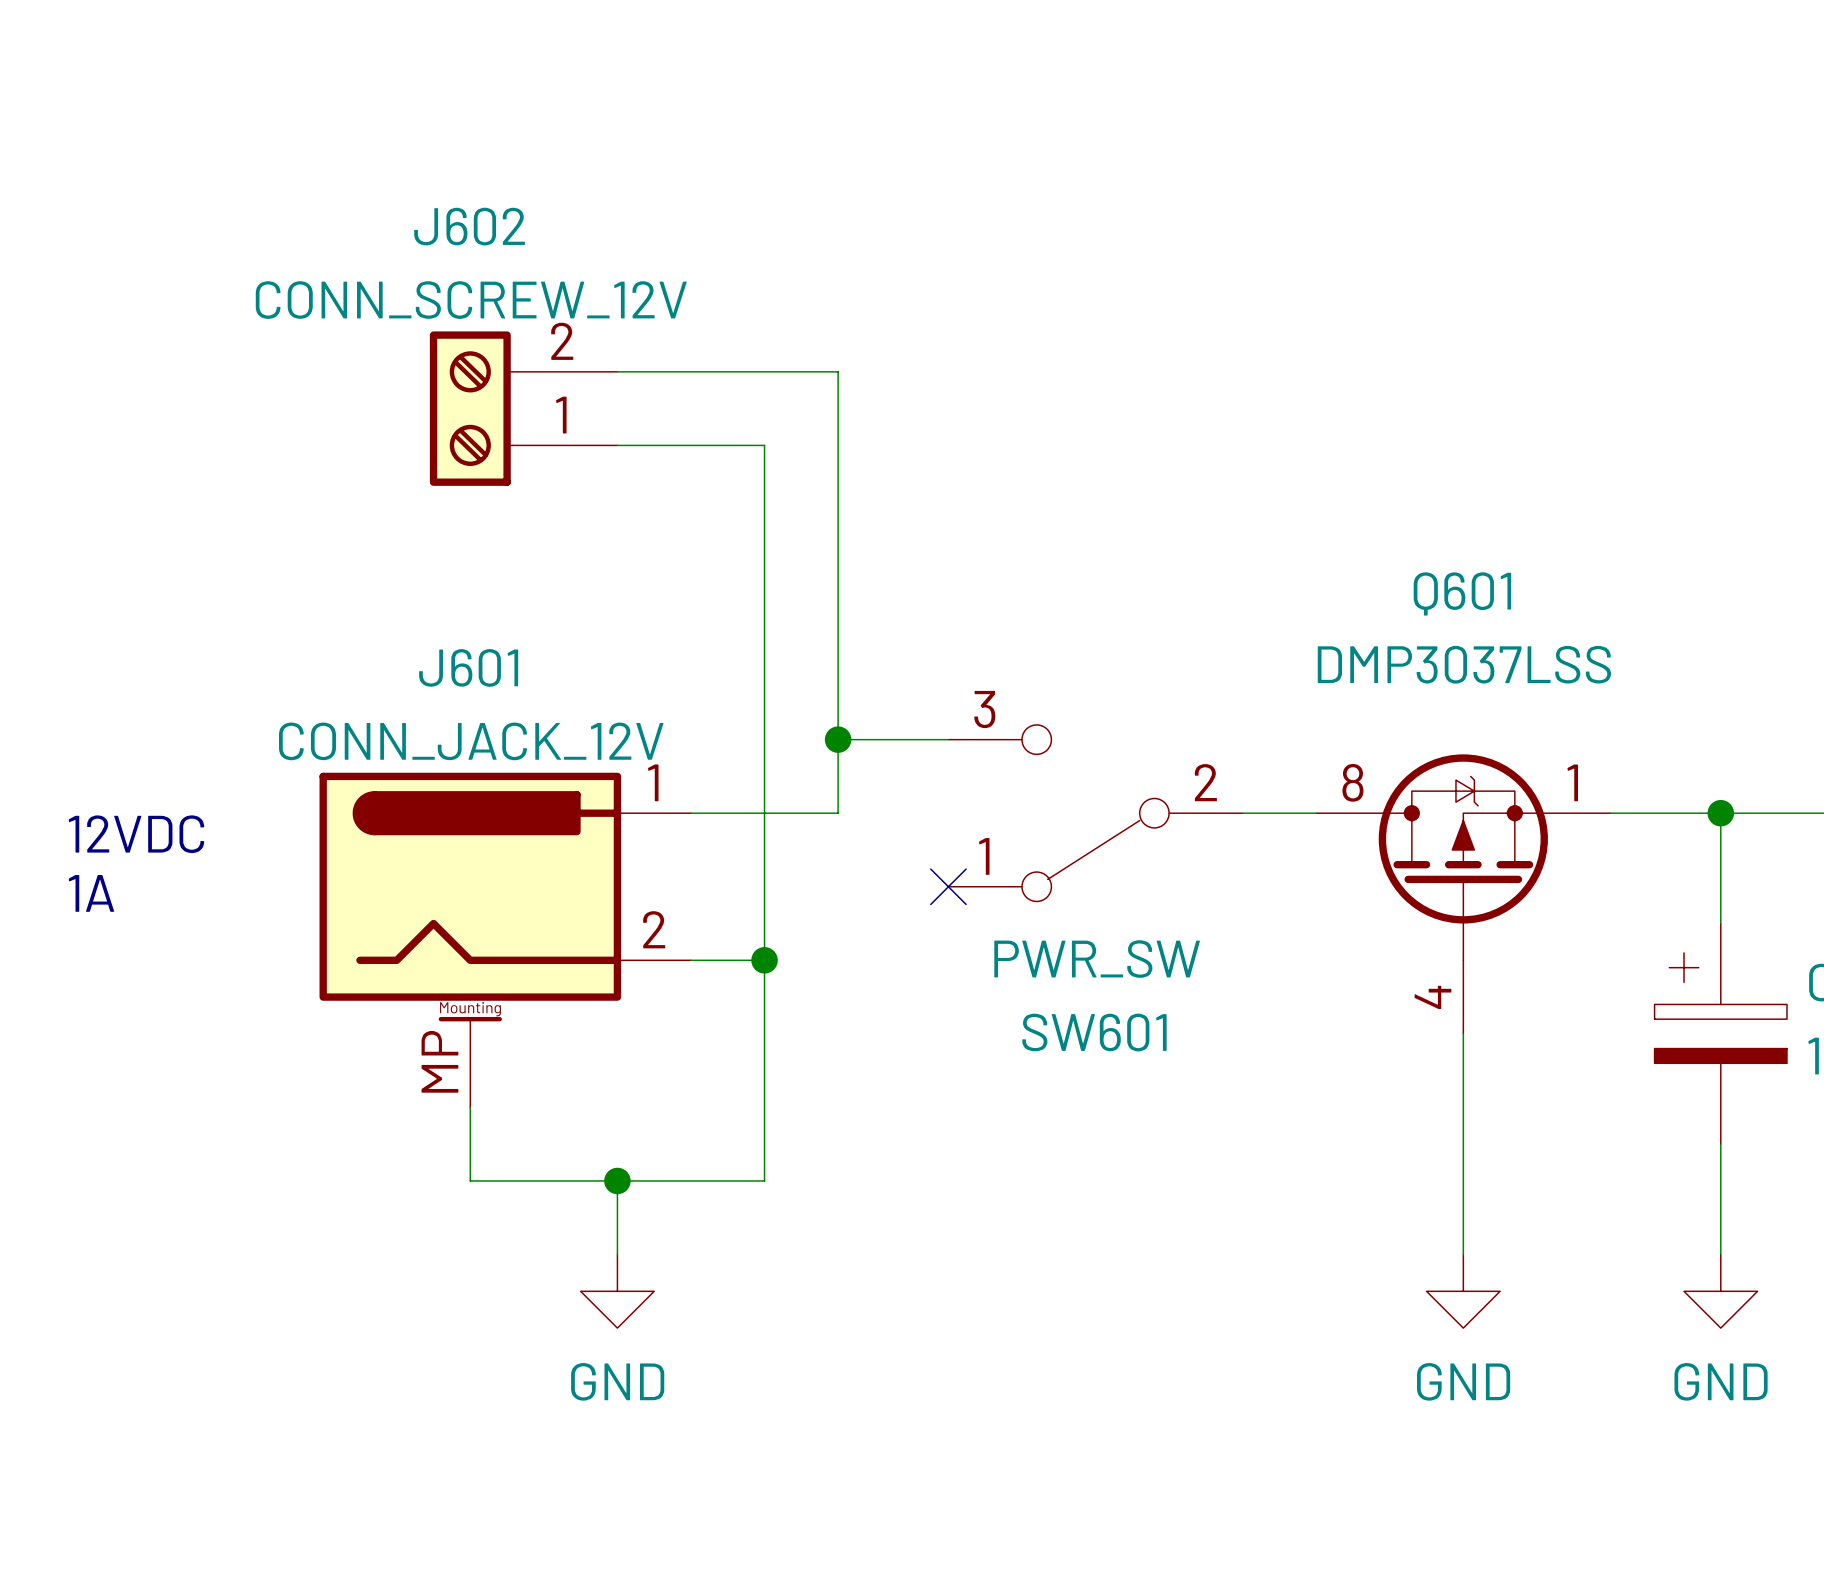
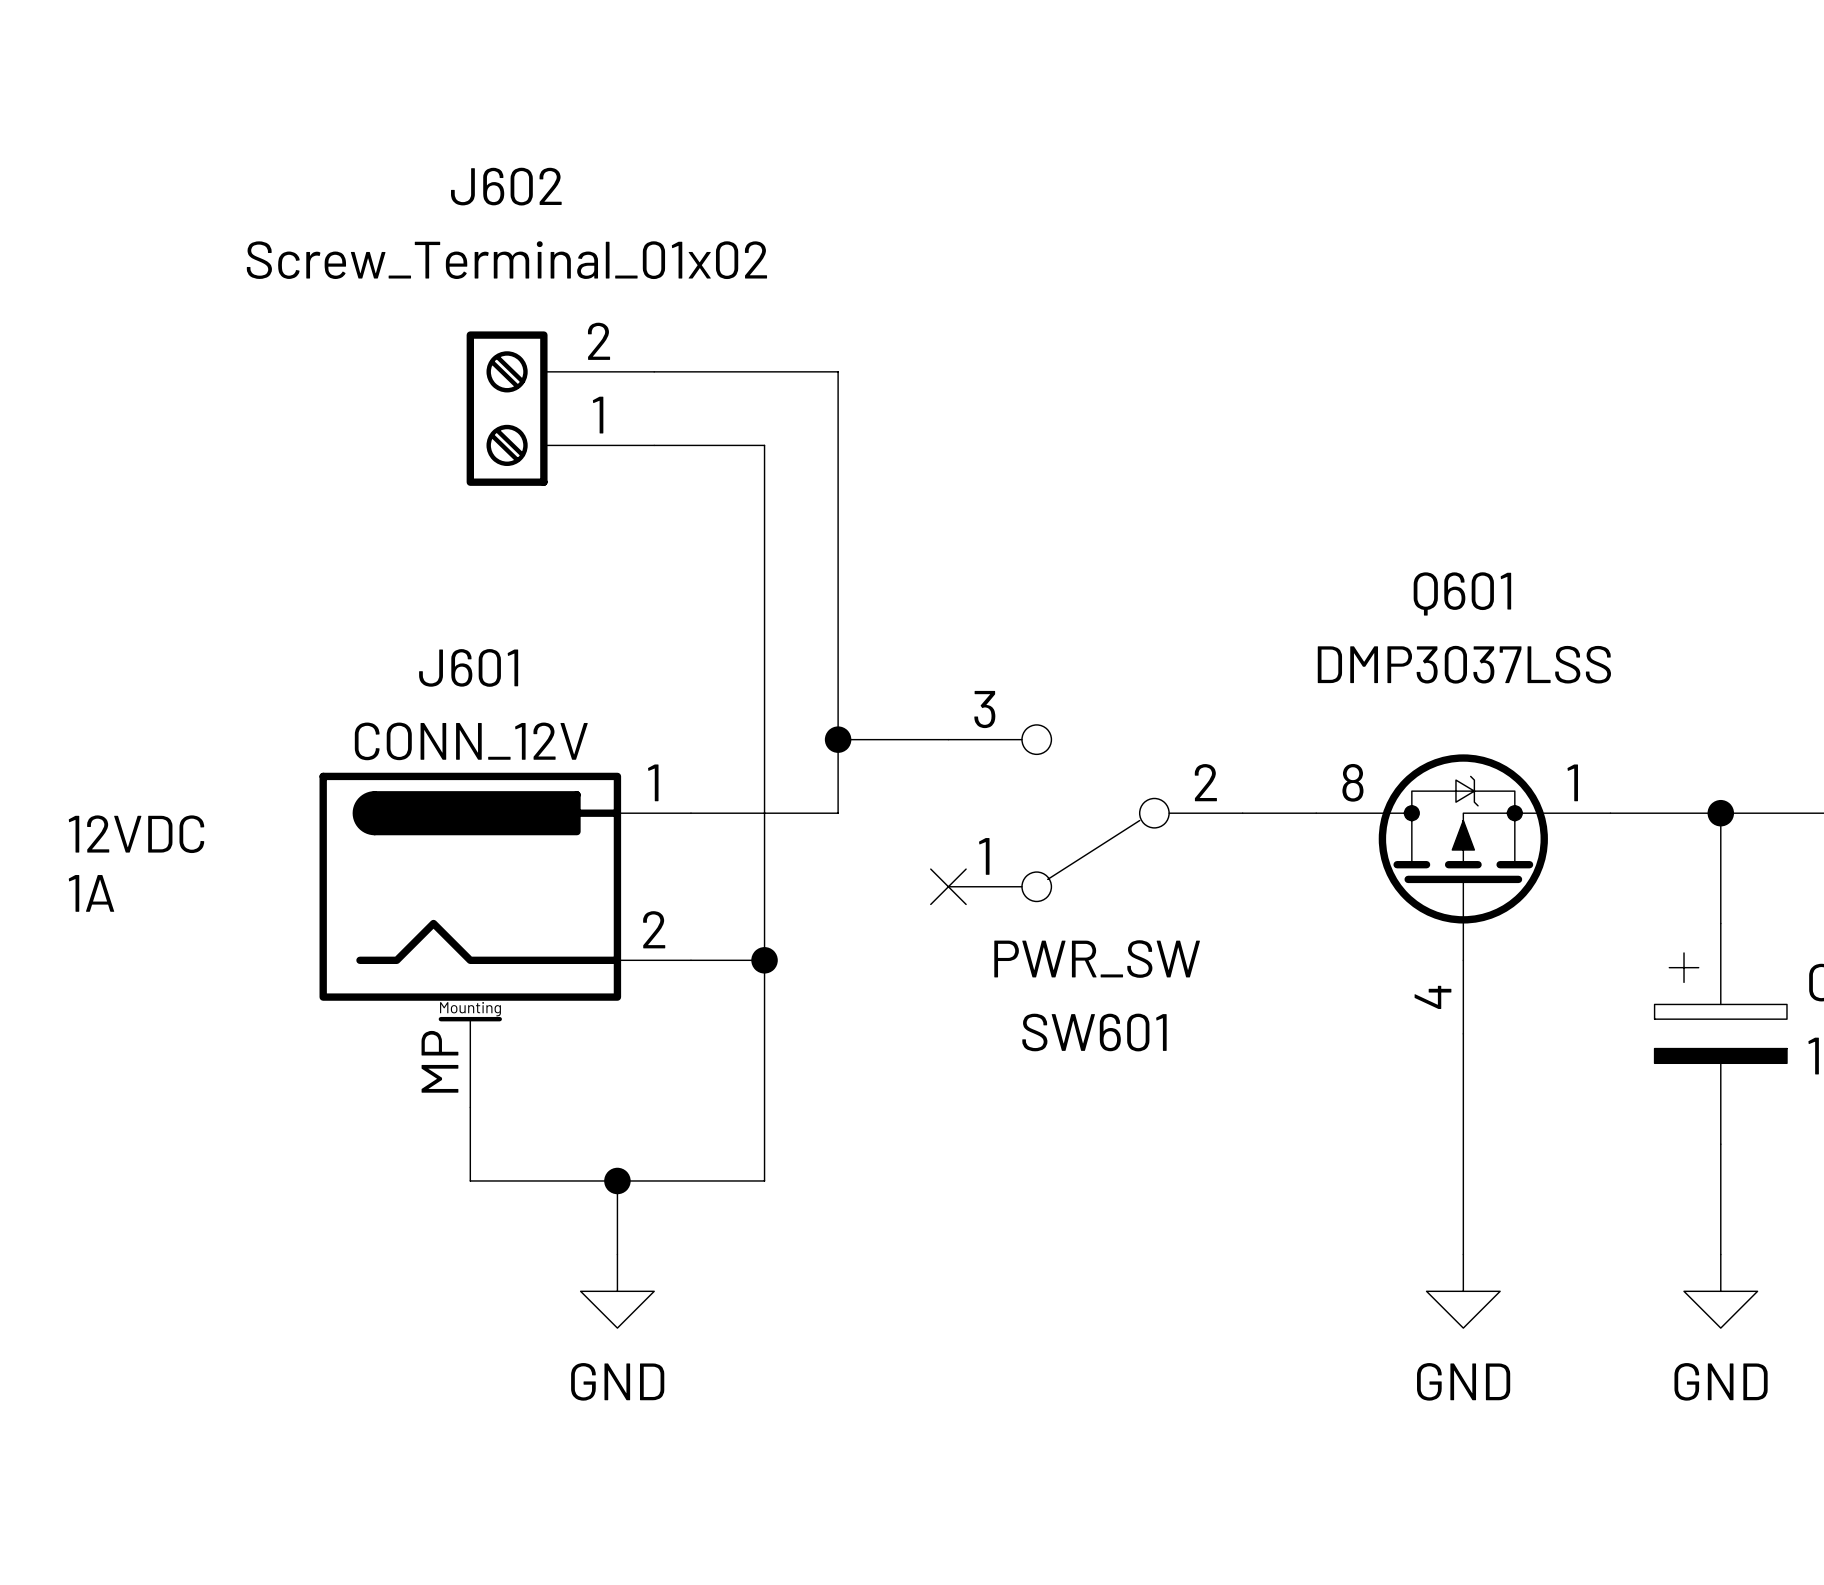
J602 name position: J602 (469, 226) -> J602 (506, 186)
J602 value: CONN_SCREW_12V (471, 300) -> Screw_Terminal_01x02 (506, 260)
J602 position: (523, 408) -> (560, 408)
J601 value: CONN_JACK_12V (471, 741) -> CONN_12V (471, 741)

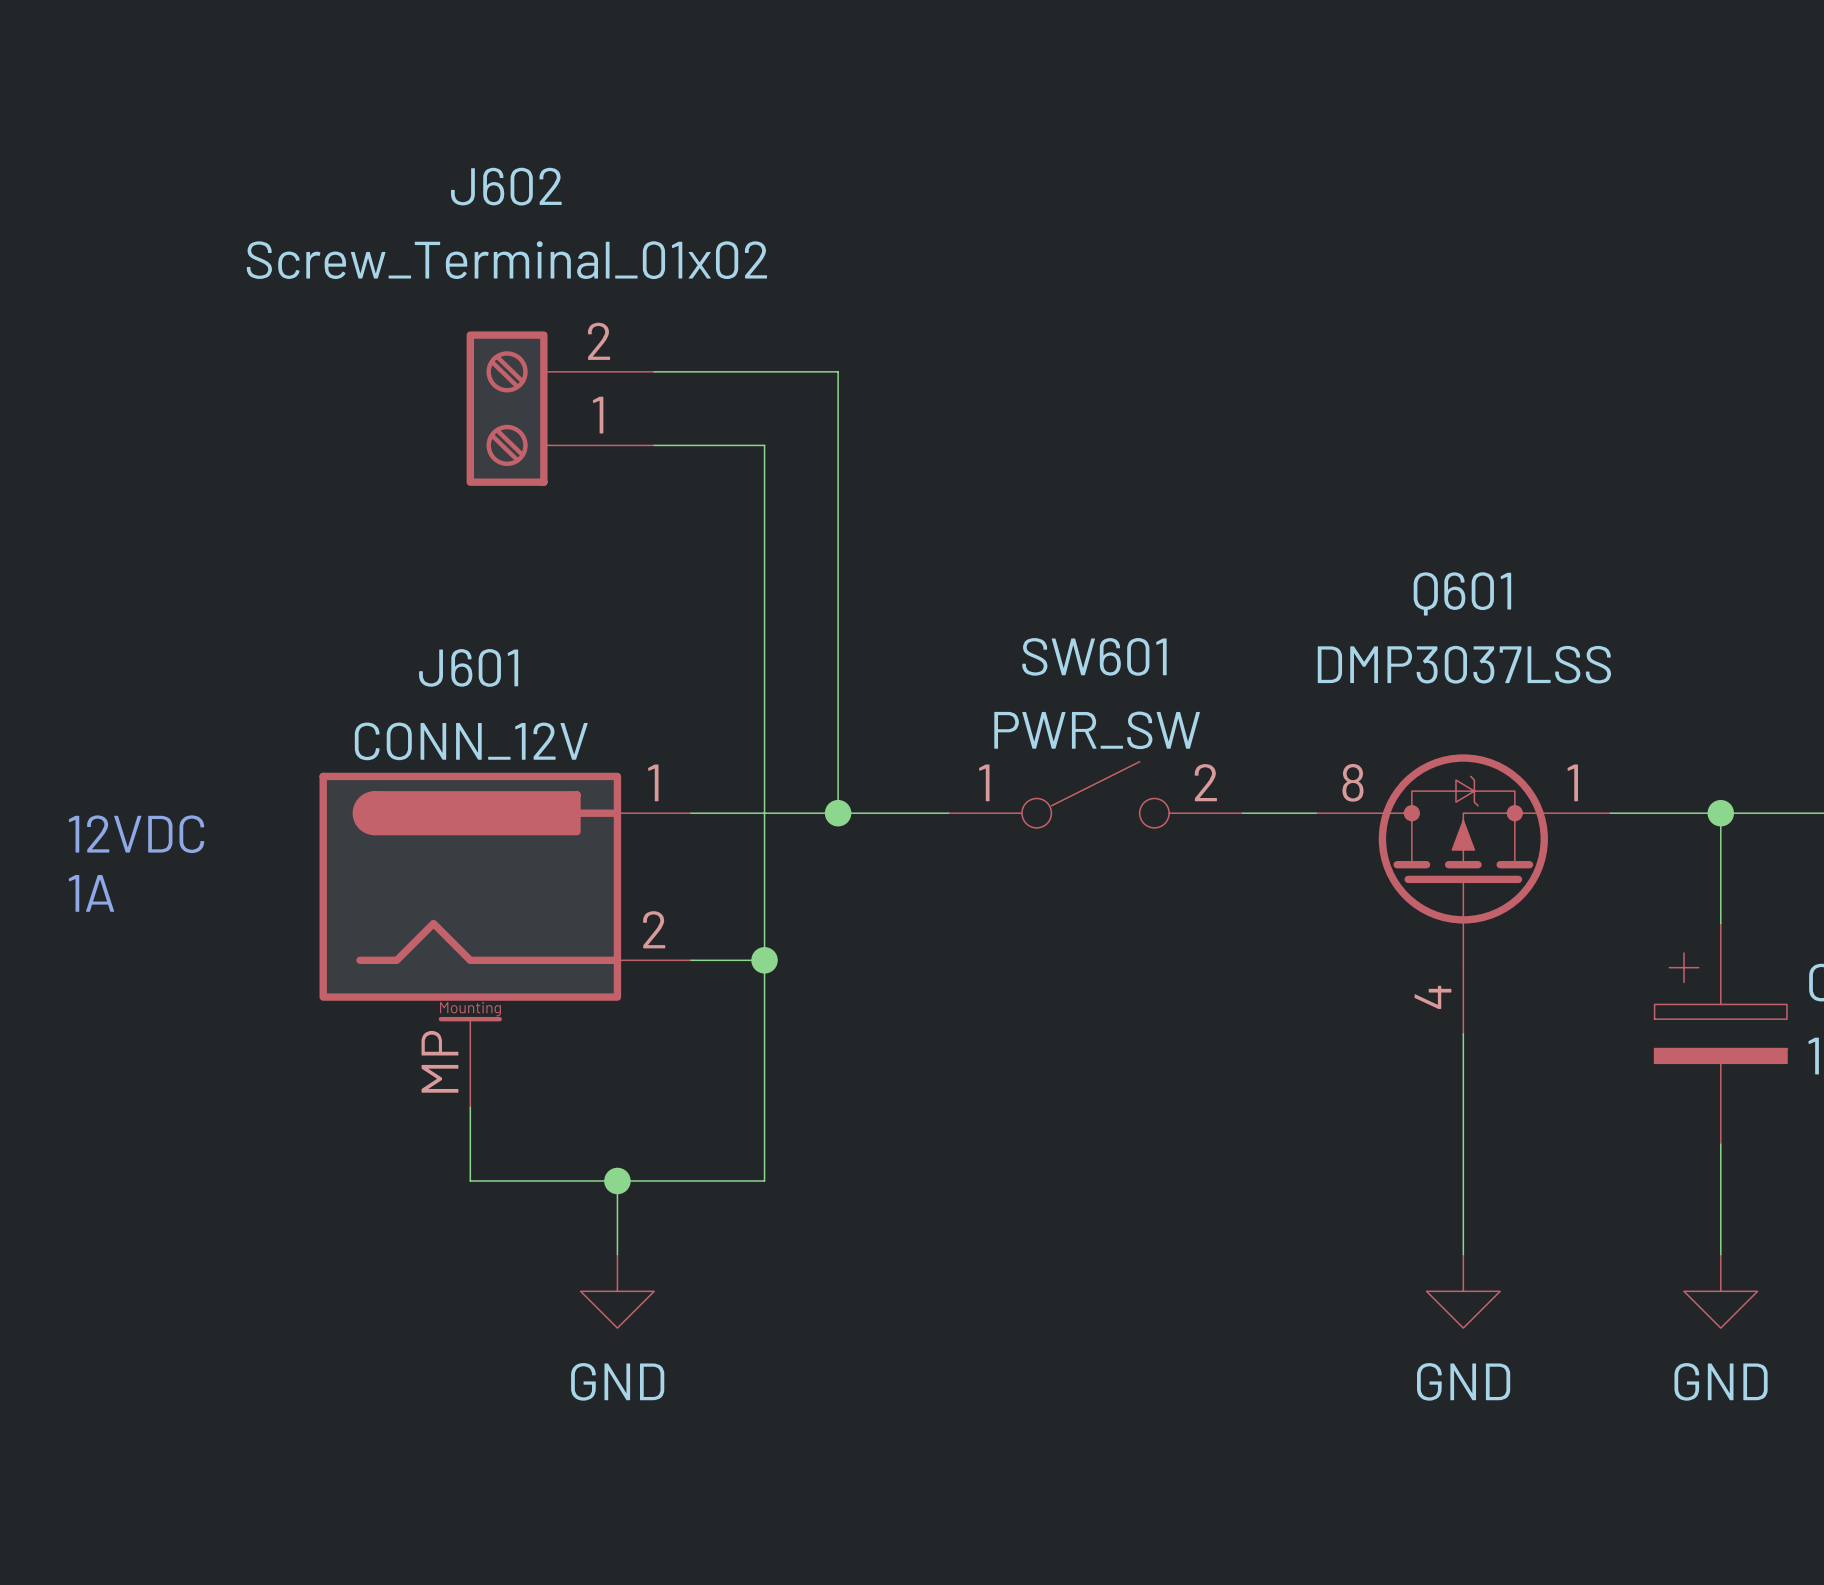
SW601 symbol: [948, 724, 1243, 902] -> [948, 761, 1243, 828]
wire: (838, 739) (948, 739) -> (838, 813) (948, 813)
junction position: (838, 739) -> (838, 813)
no-connect mark: (948, 886) -> none
SW601 value position: PWR_SW (1097, 959) -> PWR_SW (1097, 730)
SW601 name position: SW601 (1094, 1032) -> SW601 (1094, 656)

